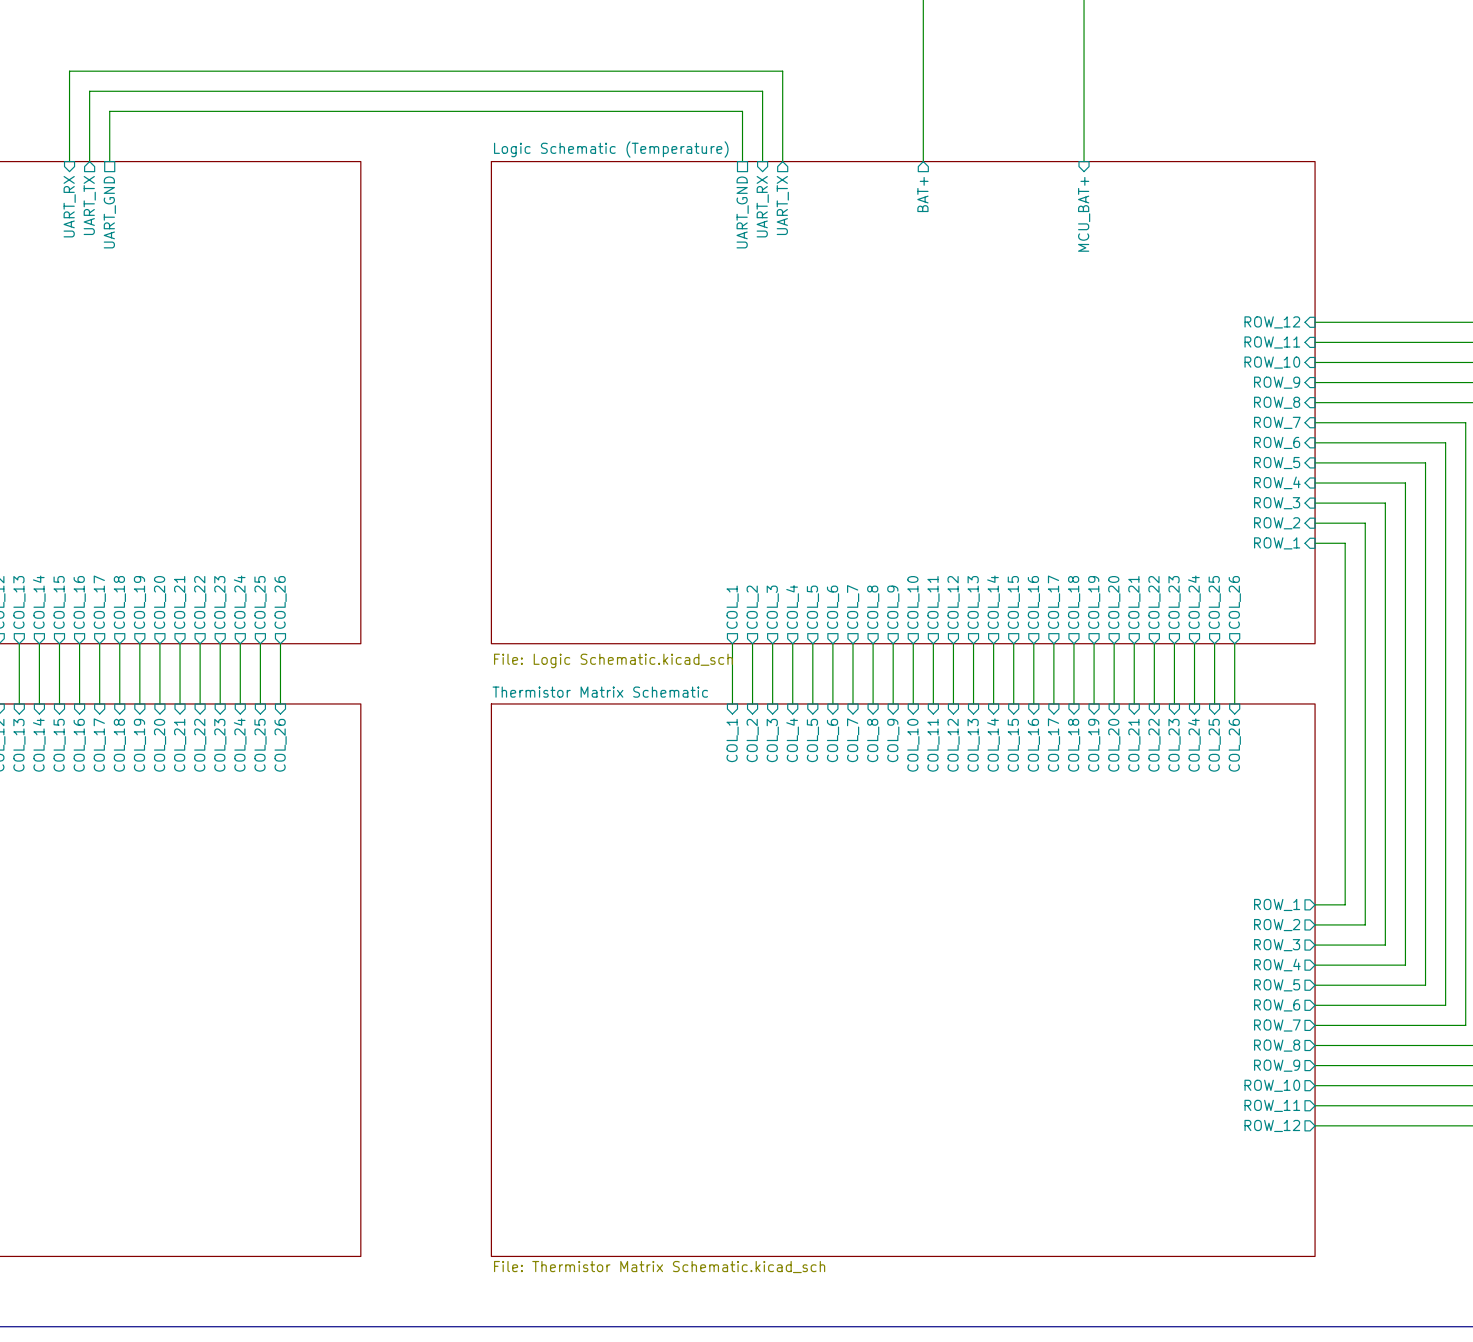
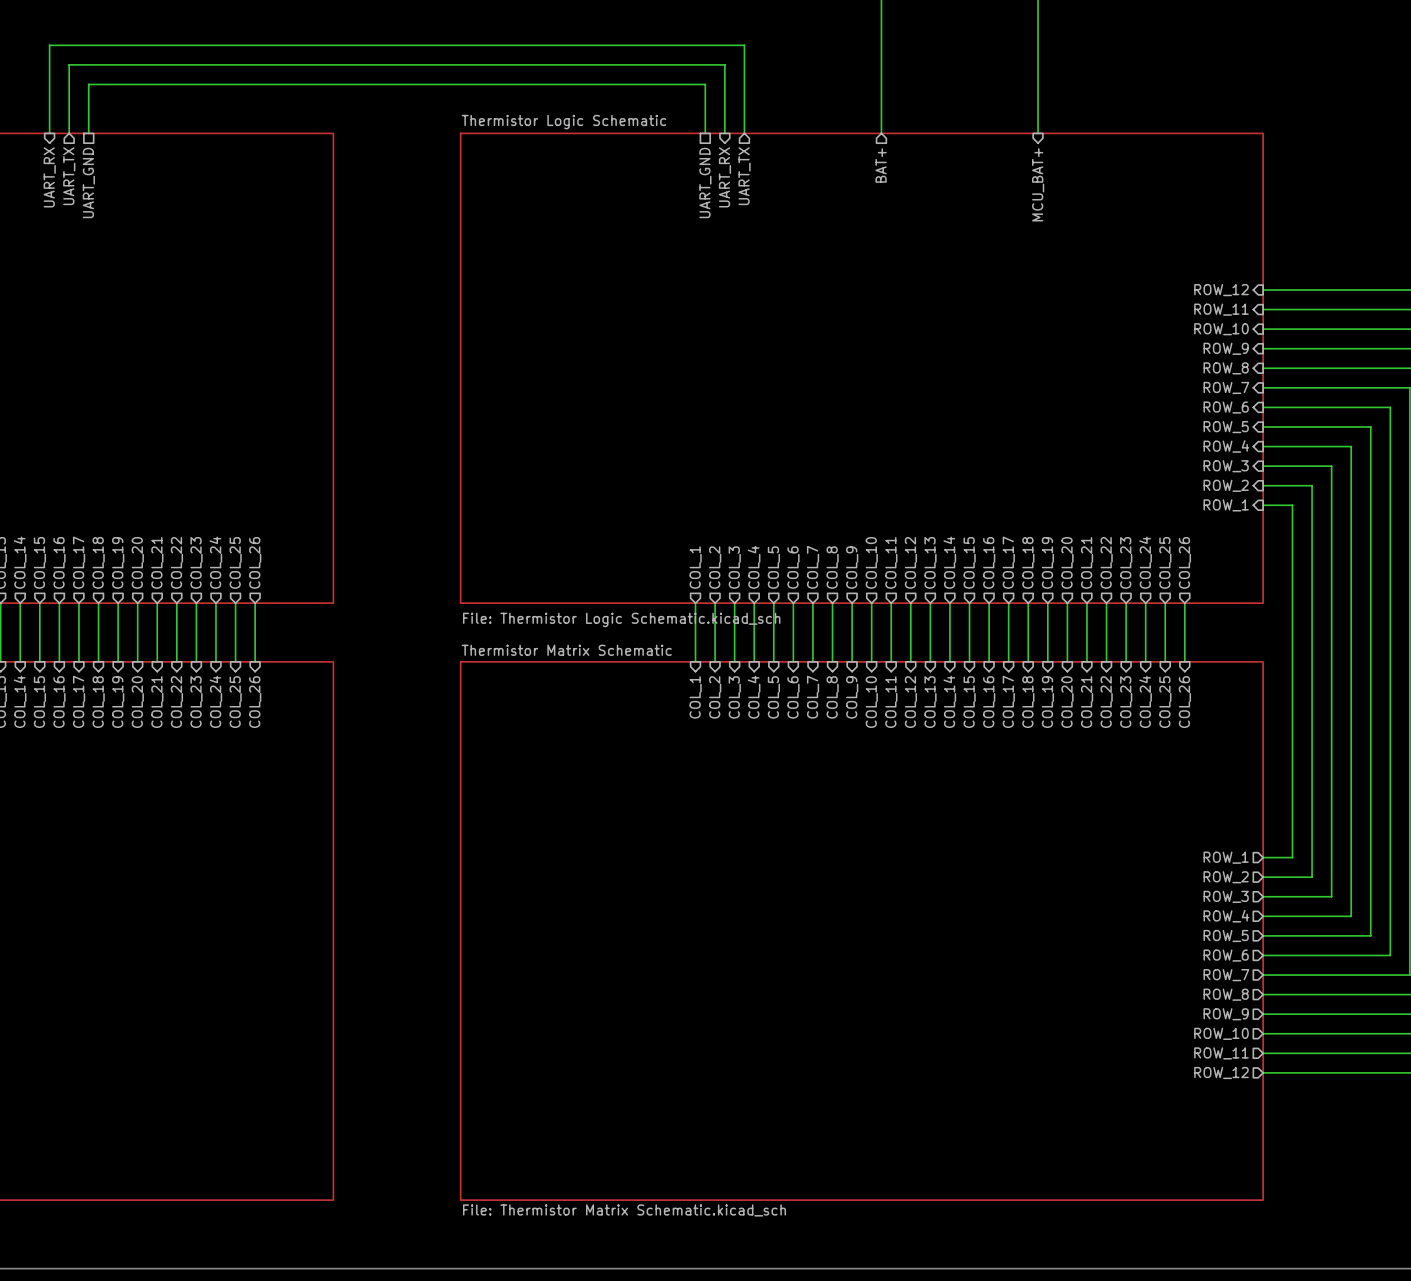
sheet Logic Schematic (Temperature) name: Logic Schematic (Temperature) (611, 149) -> Thermistor Logic Schematic (563, 122)
sheet Logic Schematic (Temperature) value: File: Logic Schematic.kicad_sch (613, 660) -> File: Thermistor Logic Schematic.kicad_sch (621, 619)

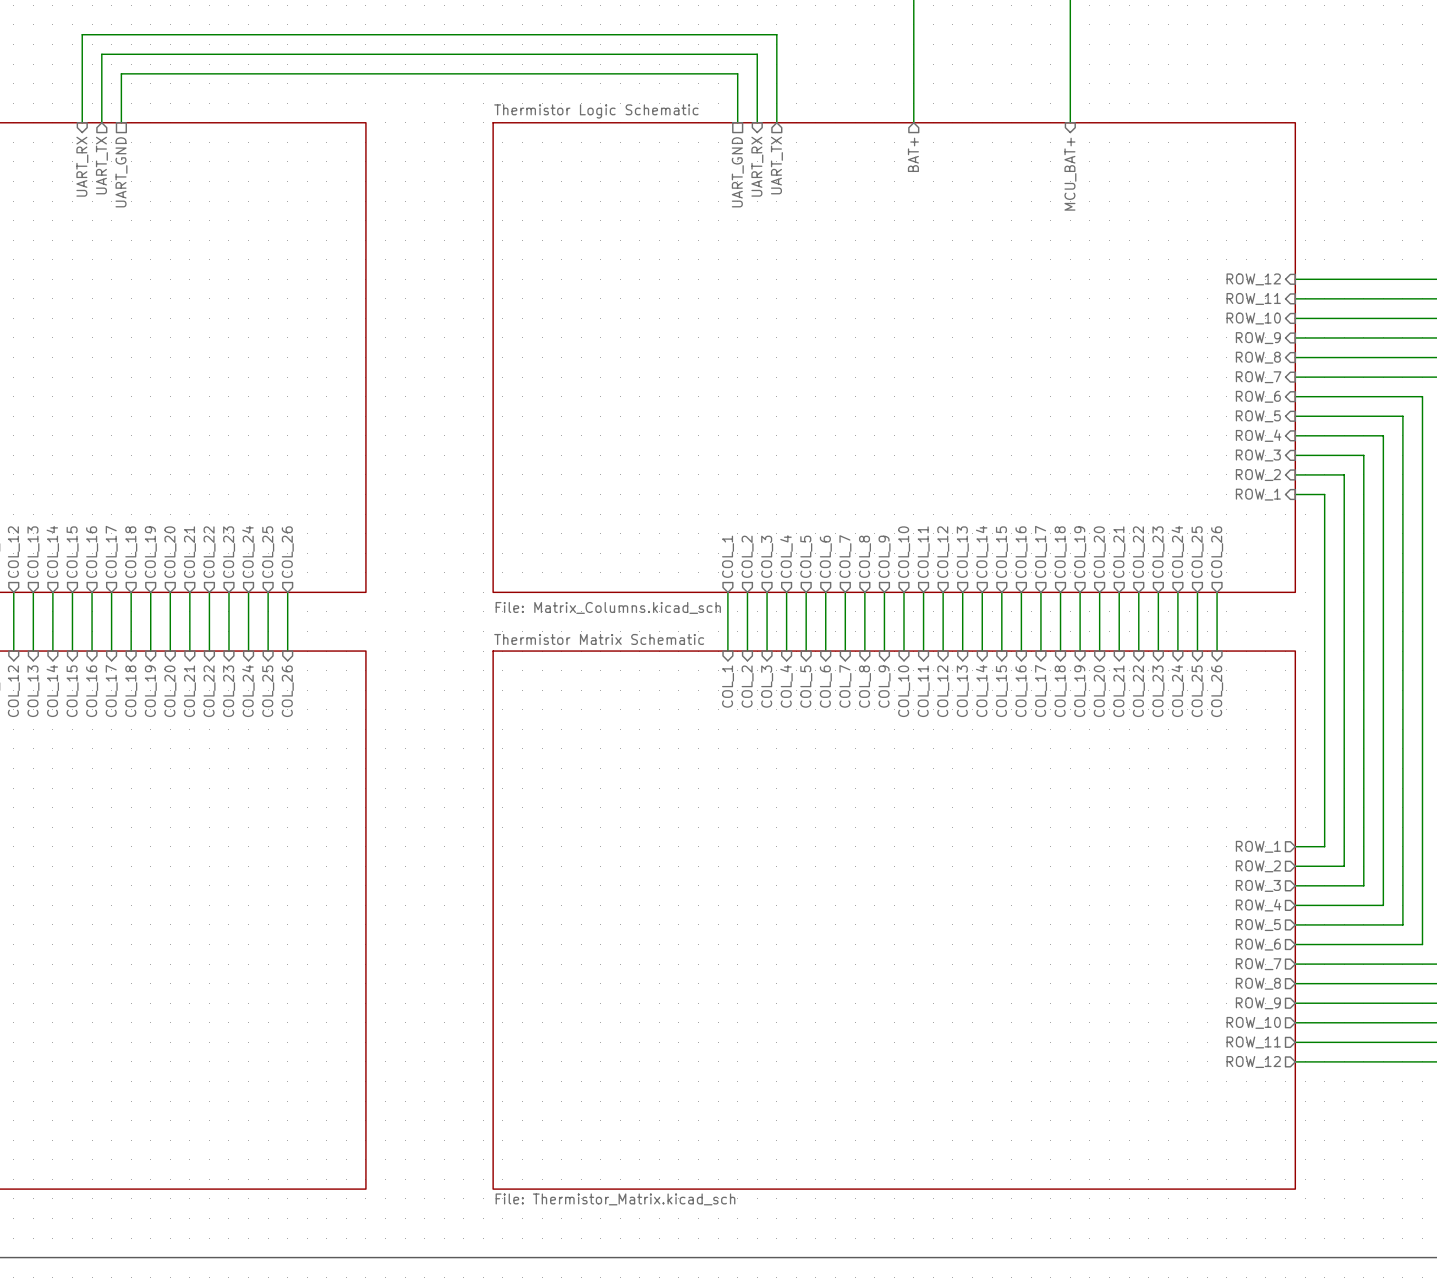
sheet Thermistor Logic Schematic value: File: Thermistor Logic Schematic.kicad_sch (621, 619) -> File: Matrix_Columns.kicad_sch (608, 607)
sheet Thermistor Matrix Schematic value: File: Thermistor Matrix Schematic.kicad_sch (624, 1210) -> File: Thermistor_Matrix.kicad_sch (615, 1199)

